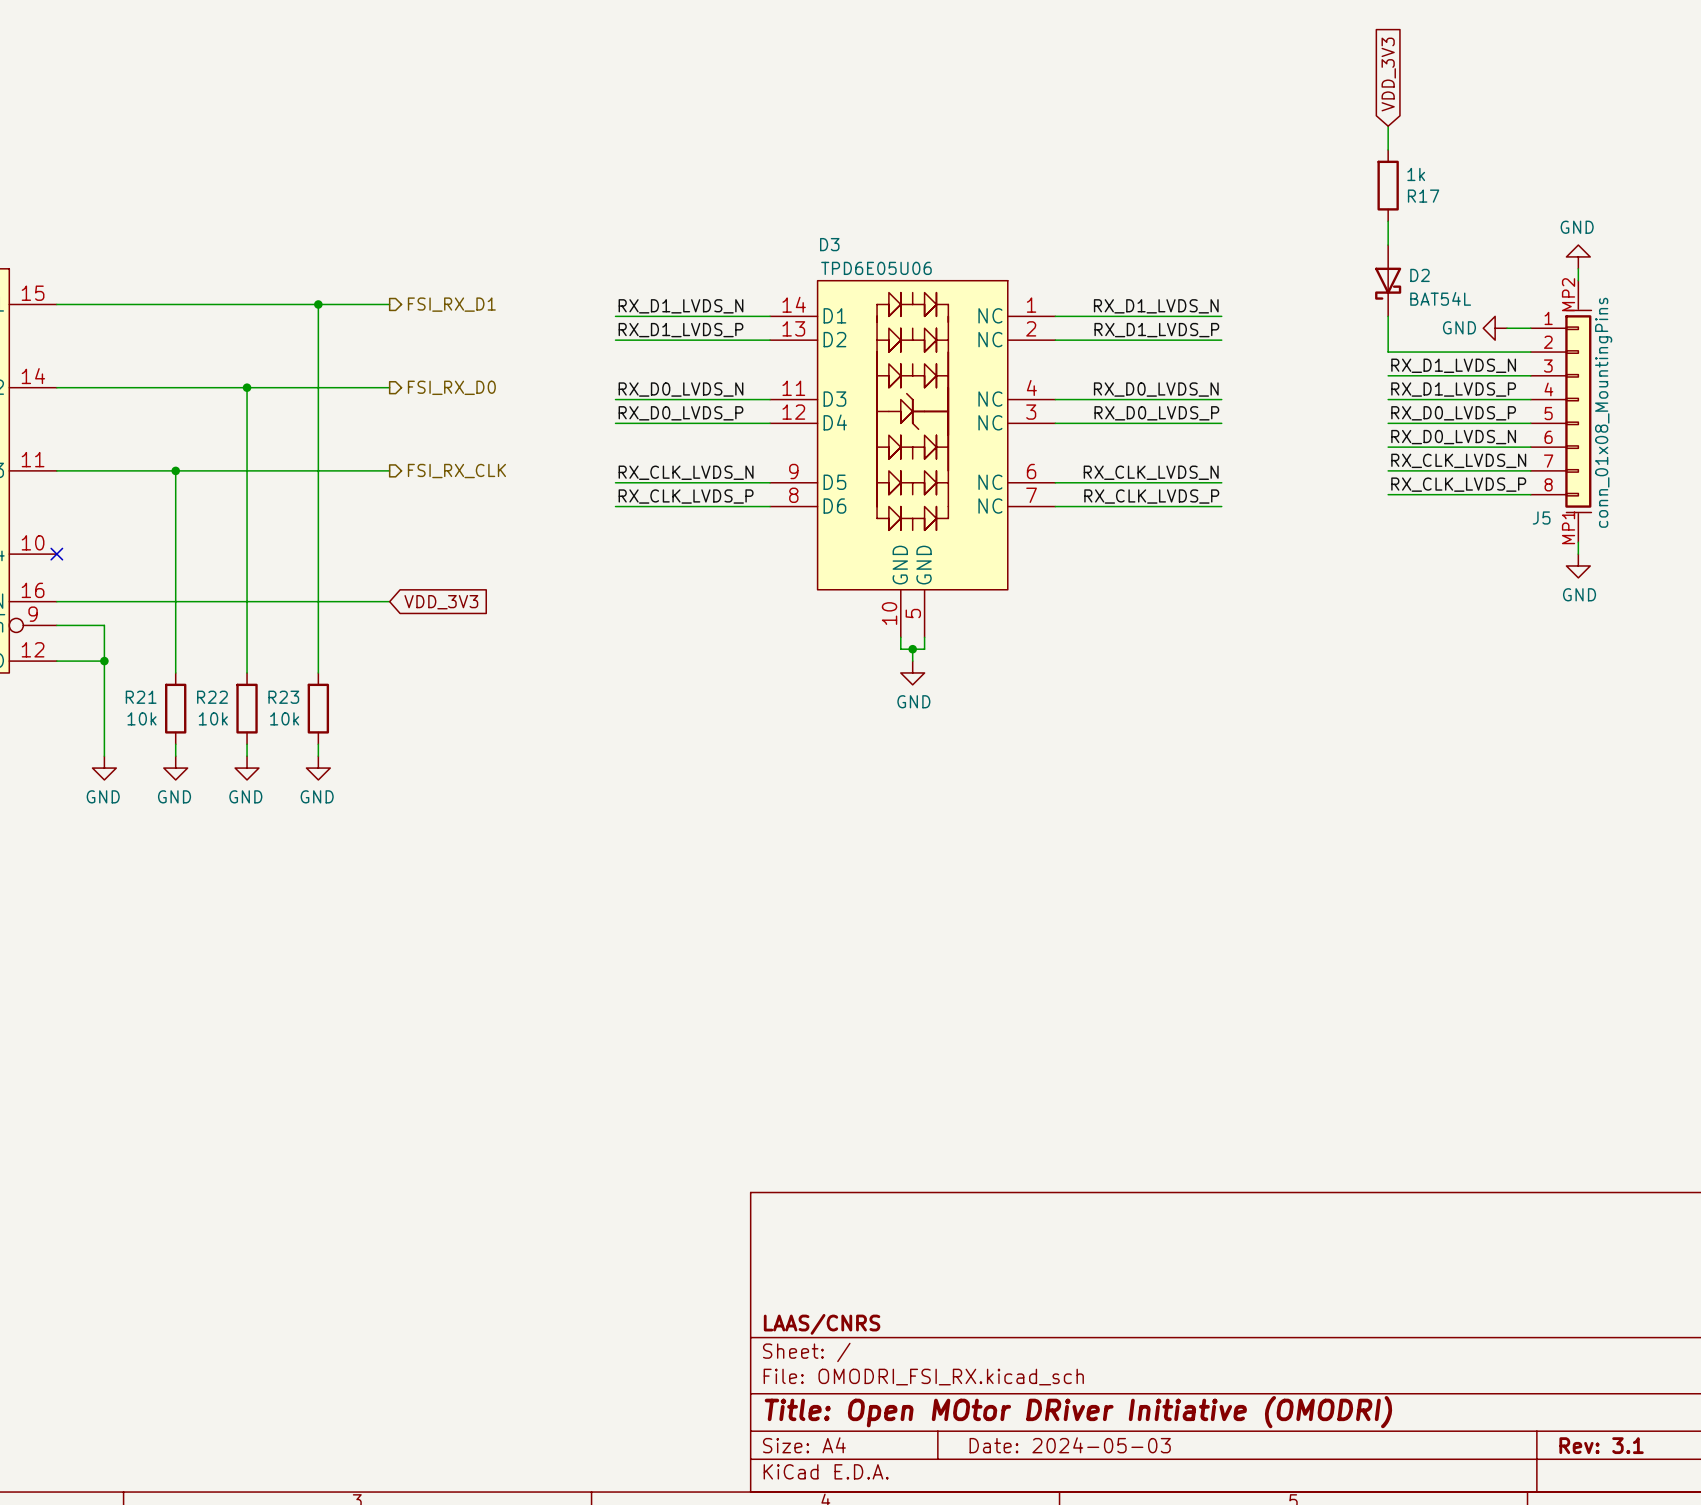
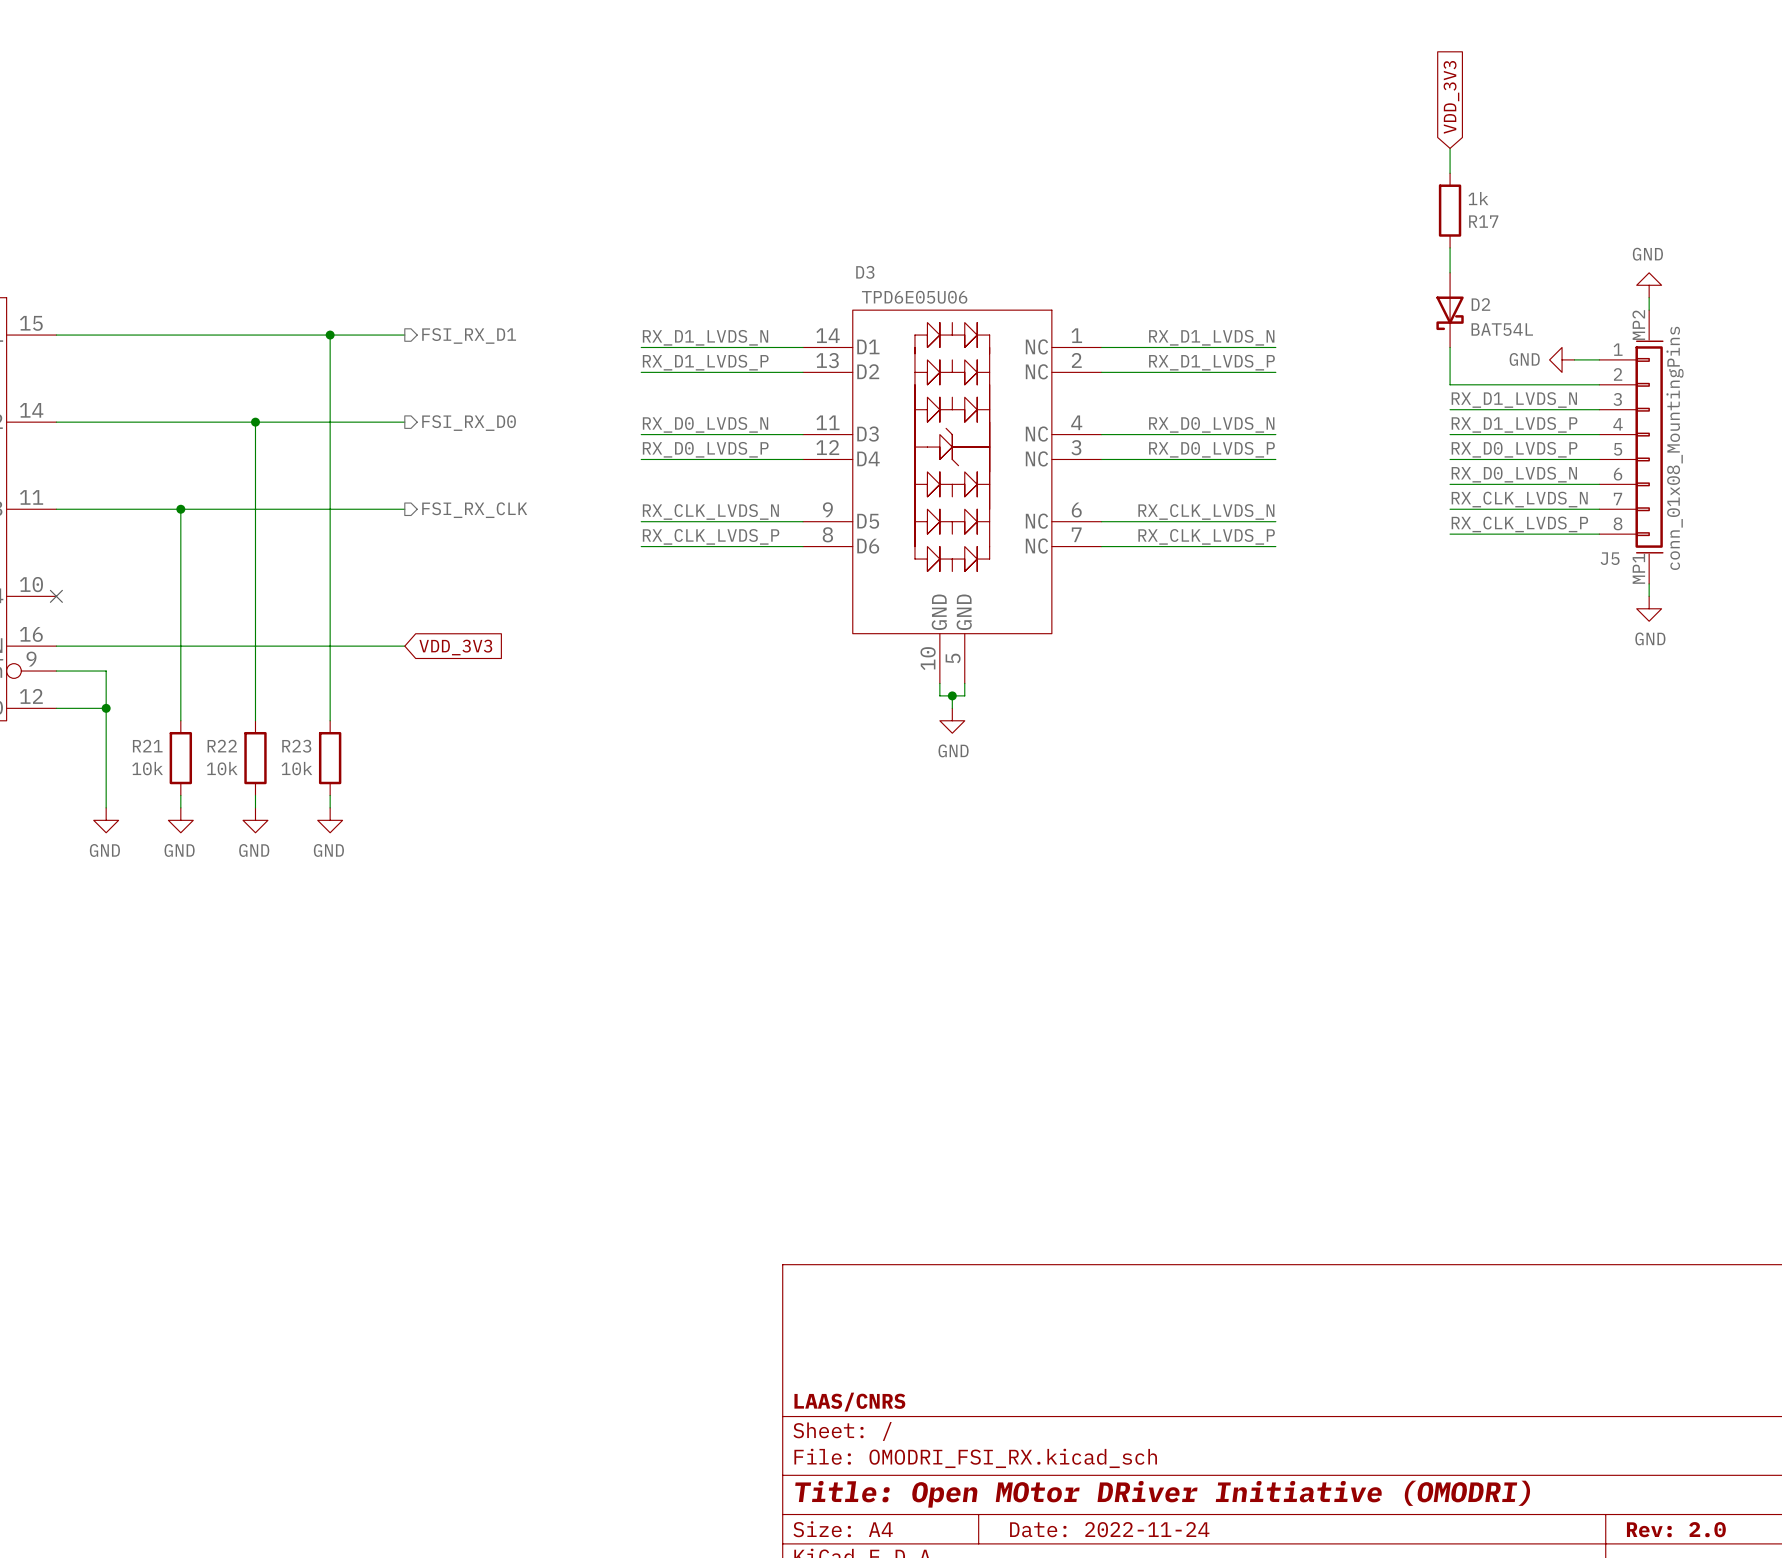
title block: Date: 2024-05-03 (1070, 1445) -> Date: 2022-11-24 (1109, 1529)
title block: Rev: 3.1 (1601, 1445) -> Rev: 2.0 (1676, 1529)

